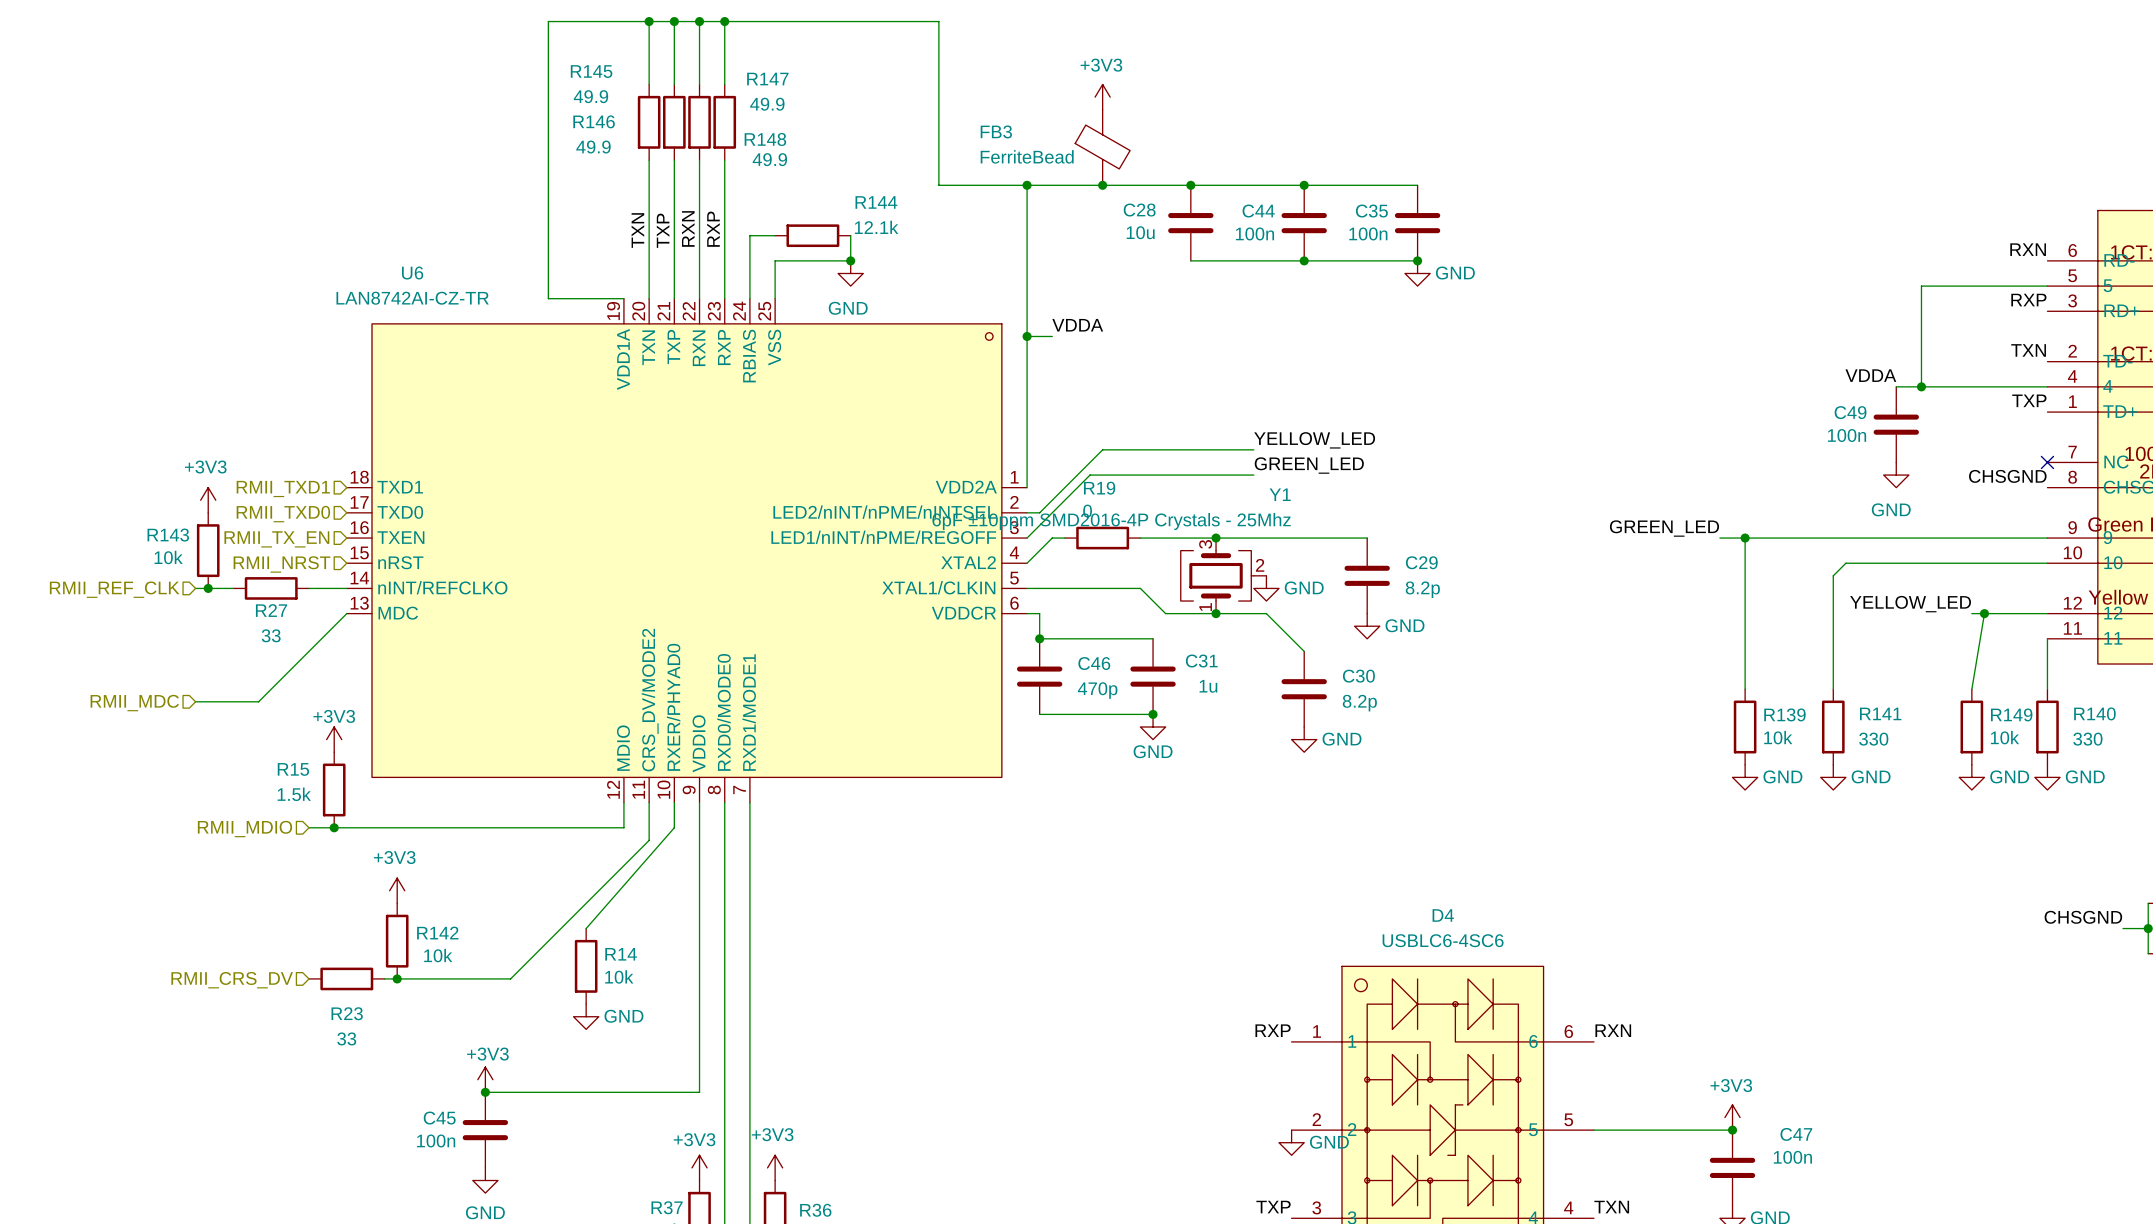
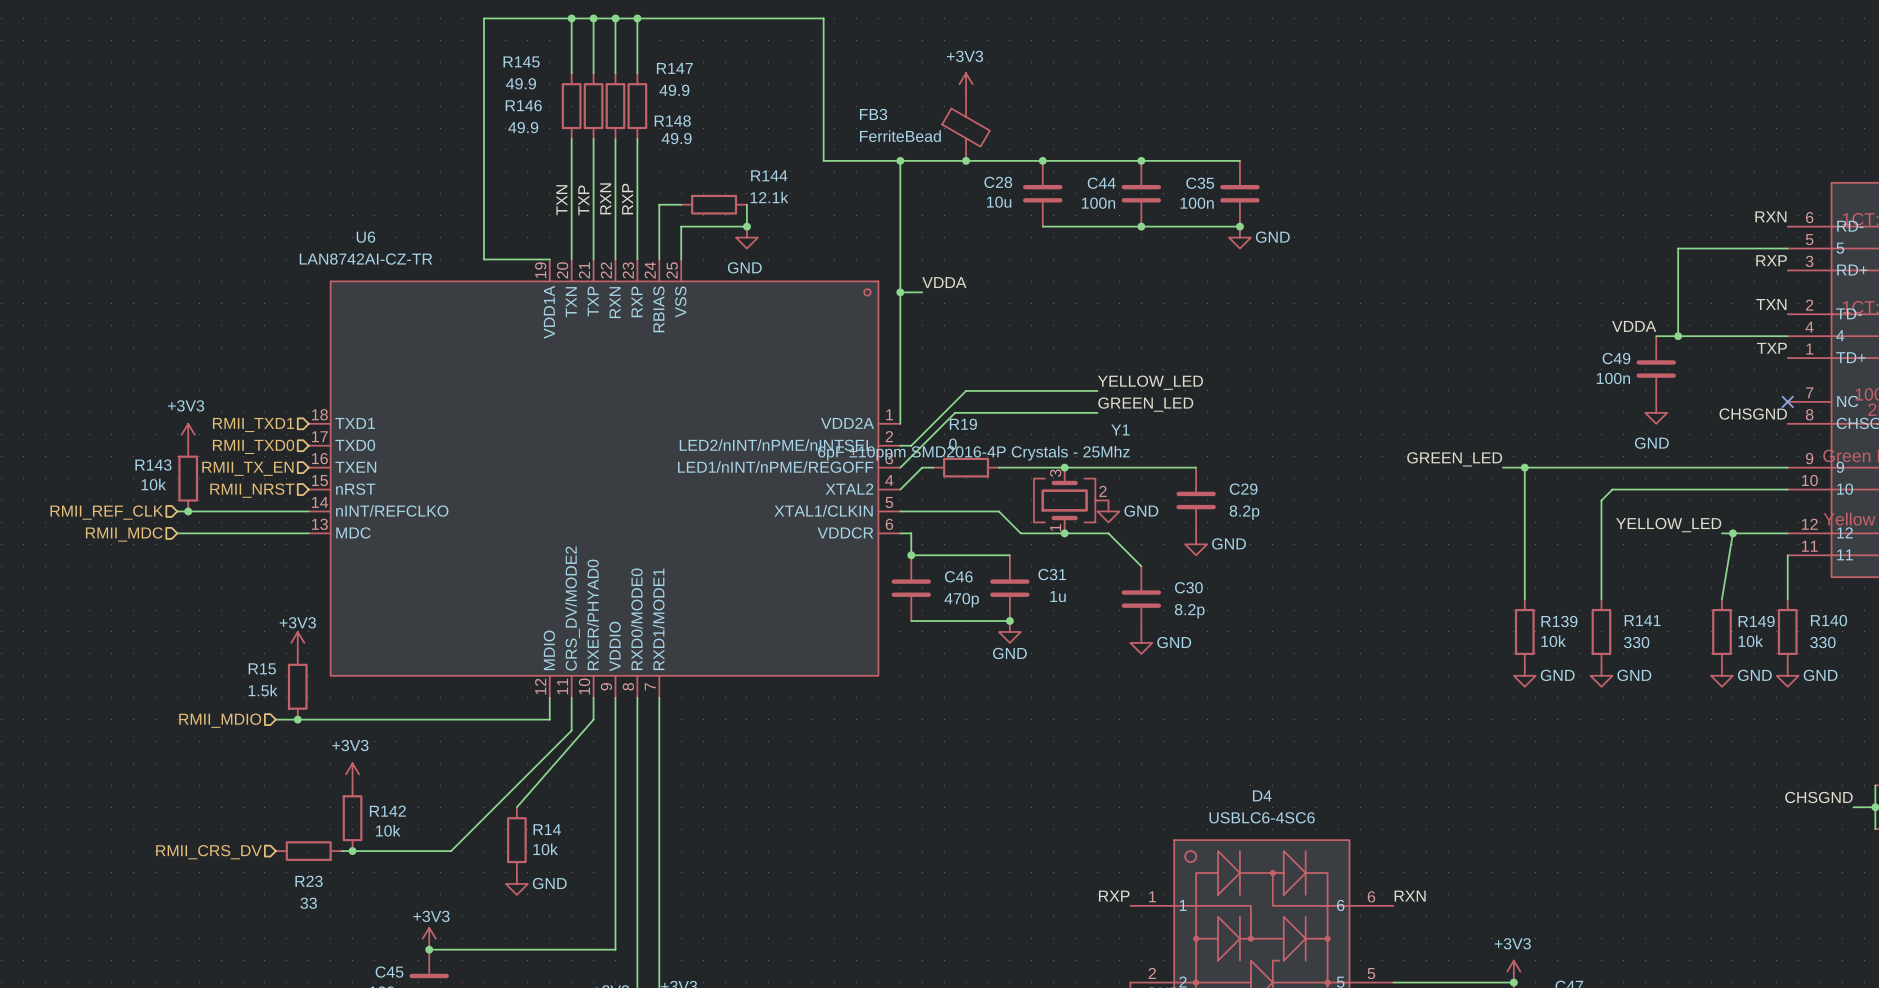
wire: none -> (210, 511) (275, 511)
R27: 33 (271, 588) -> none
wire: (346, 613) (258, 701) (195, 701) -> (308, 533) (177, 533)
hierarchical label position: RMII_MDC (134, 703) -> RMII_MDC (124, 534)

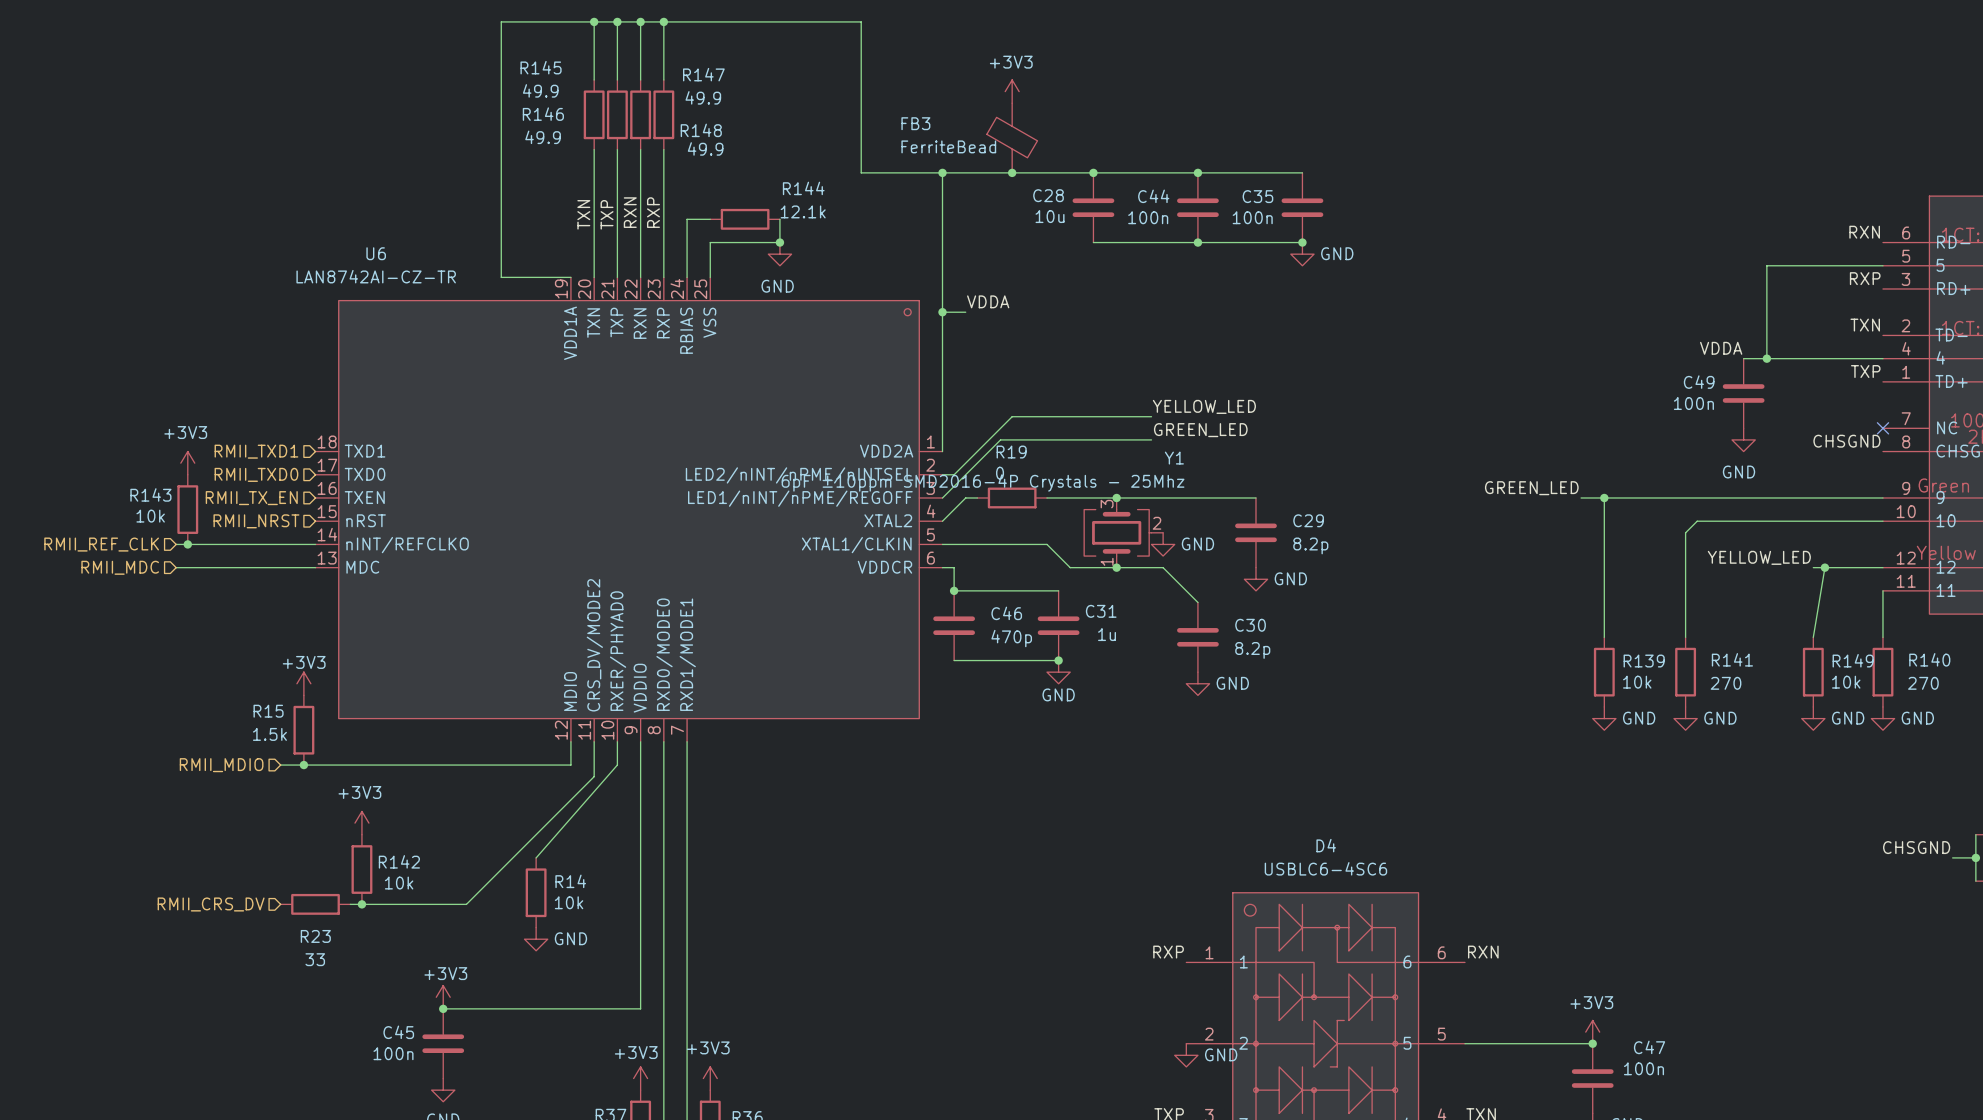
R141 value: 330 (1636, 642) -> 270 (1726, 683)
R140 value: 330 (1822, 642) -> 270 (1923, 683)

